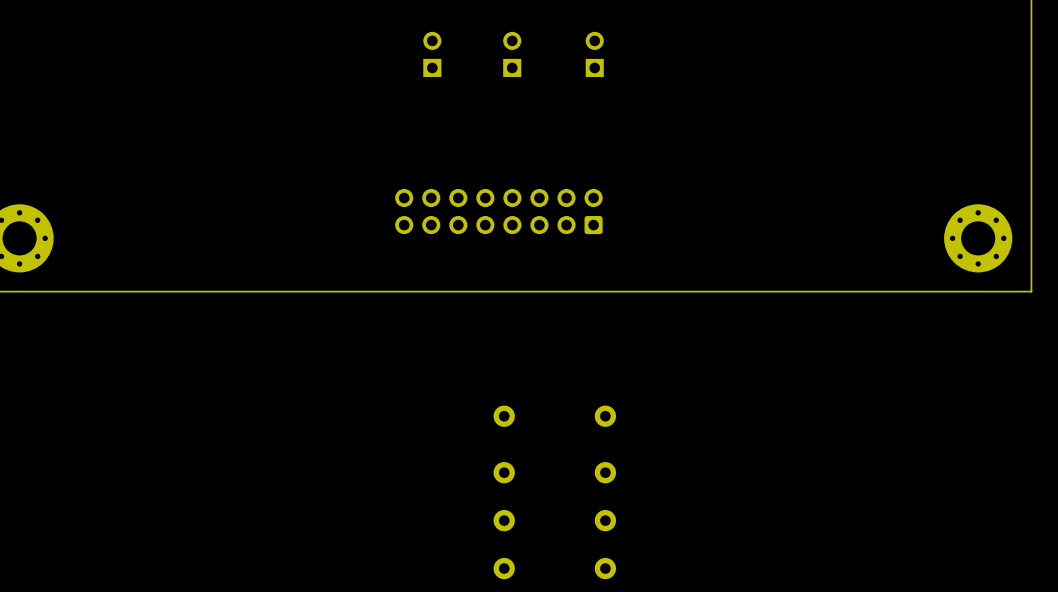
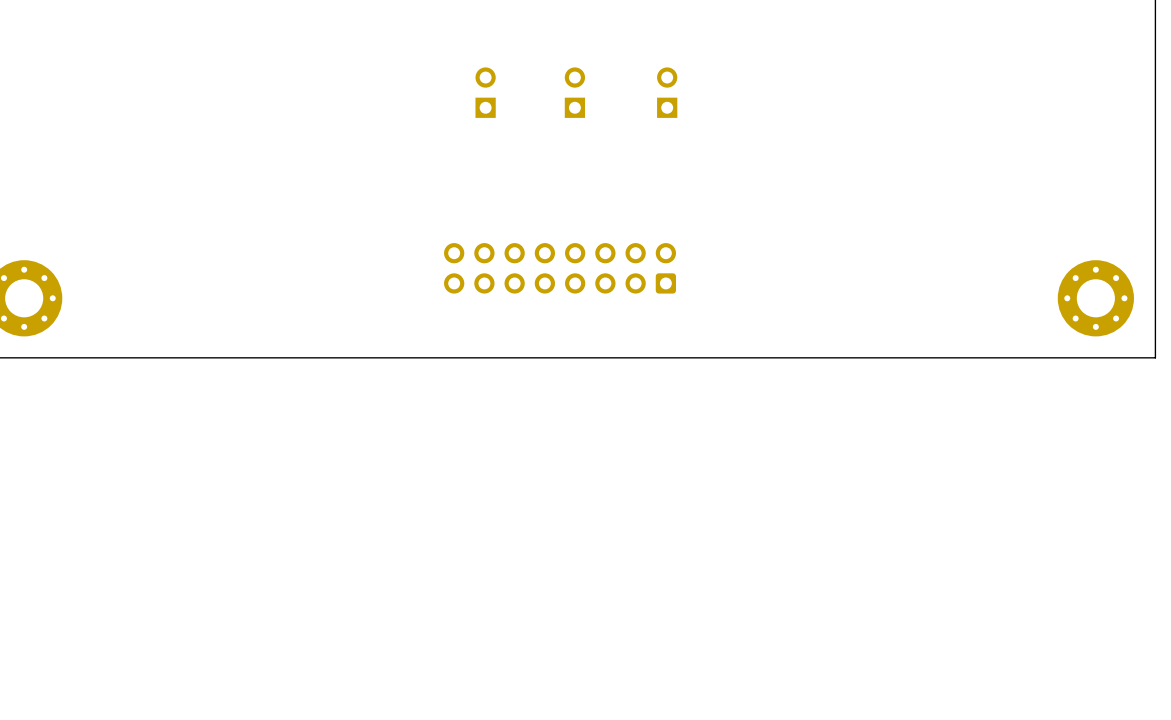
part: (504, 416) -> none
part: (605, 416) -> none
part: (504, 472) -> none
part: (605, 472) -> none
part: (504, 520) -> none
part: (605, 520) -> none
part: (504, 568) -> none
part: (605, 568) -> none

